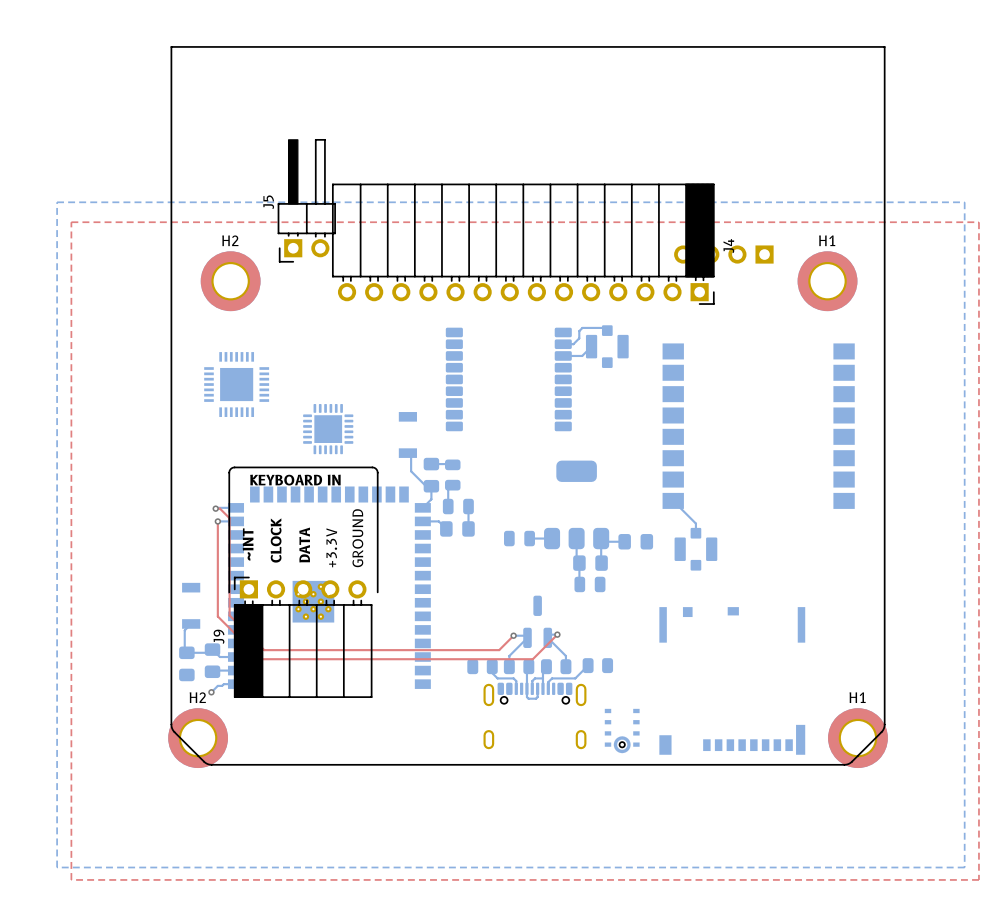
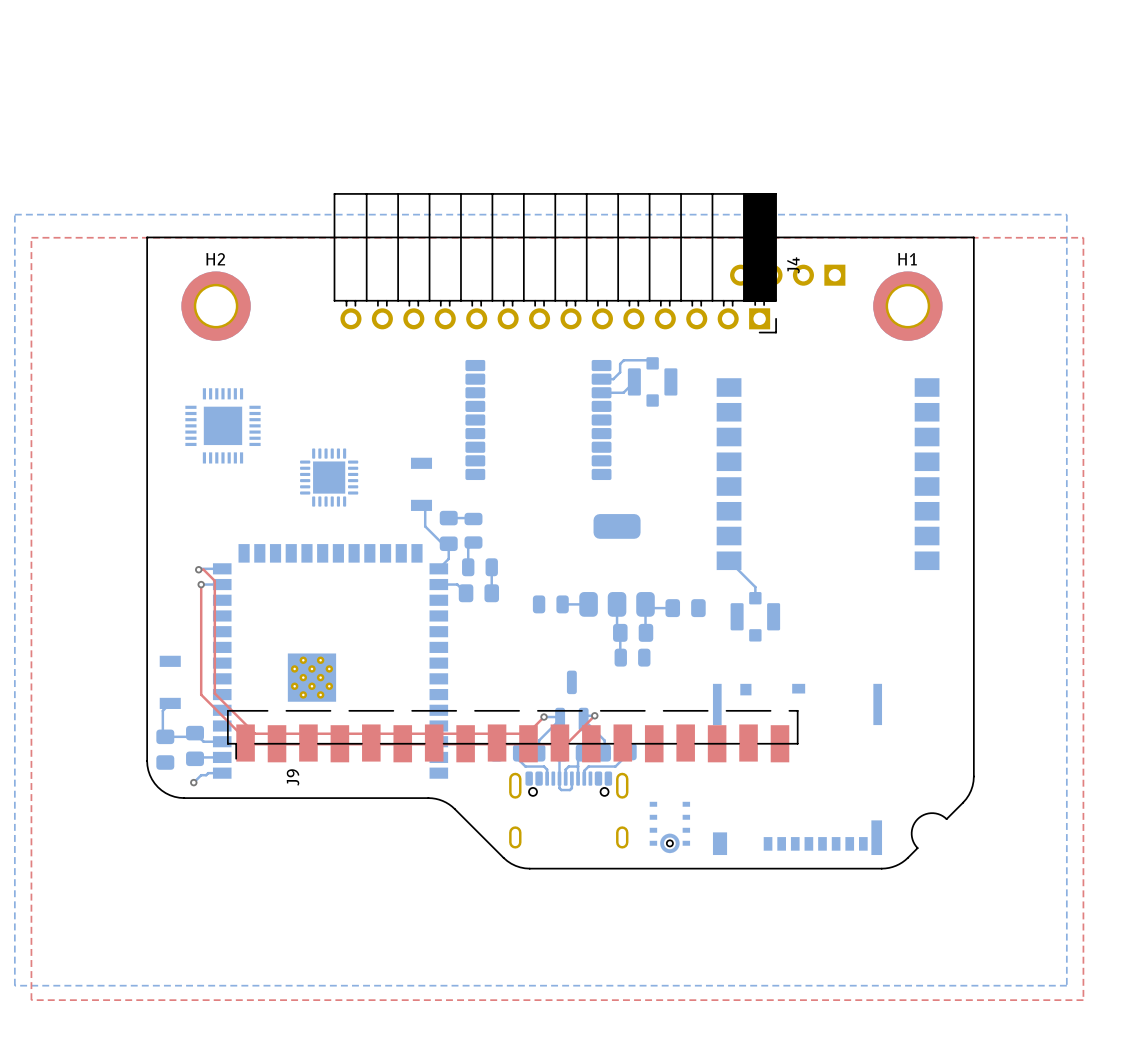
board edge: (171, 46) (171, 724) (174, 732) (204, 762) (211, 764) (844, 764) (852, 761) (882, 731) (884, 724) (884, 46) (171, 46) -> (147, 237) (147, 760) (152, 779) (161, 790) (174, 796) (184, 798) (435, 798) (452, 806) (507, 861) (515, 865) (529, 868) (888, 867) (902, 862) (917, 848) (912, 839) (911, 832) (917, 819) (930, 813) (938, 814) (946, 819) (966, 799) (972, 786) (973, 776) (973, 237) (147, 237)
J5: (306, 200) -> none
text: KEYBOARD IN (295, 480) -> none
text: GROUND (357, 538) -> none
text: CLOCK (276, 540) -> none
text: ~INT (248, 544) -> none
text: DATA (304, 545) -> none
text: +3.3V (331, 547) -> none
J9 footprint: [234, 576, 373, 698] -> [227, 710, 799, 763]
line: (229, 592) (229, 472) (230, 469) (234, 467) (375, 468) (377, 472) (377, 592) -> none
J9 name position: J9 (219, 636) -> J9 (293, 777)
H2: (198, 738) -> none
H1: (857, 738) -> none

